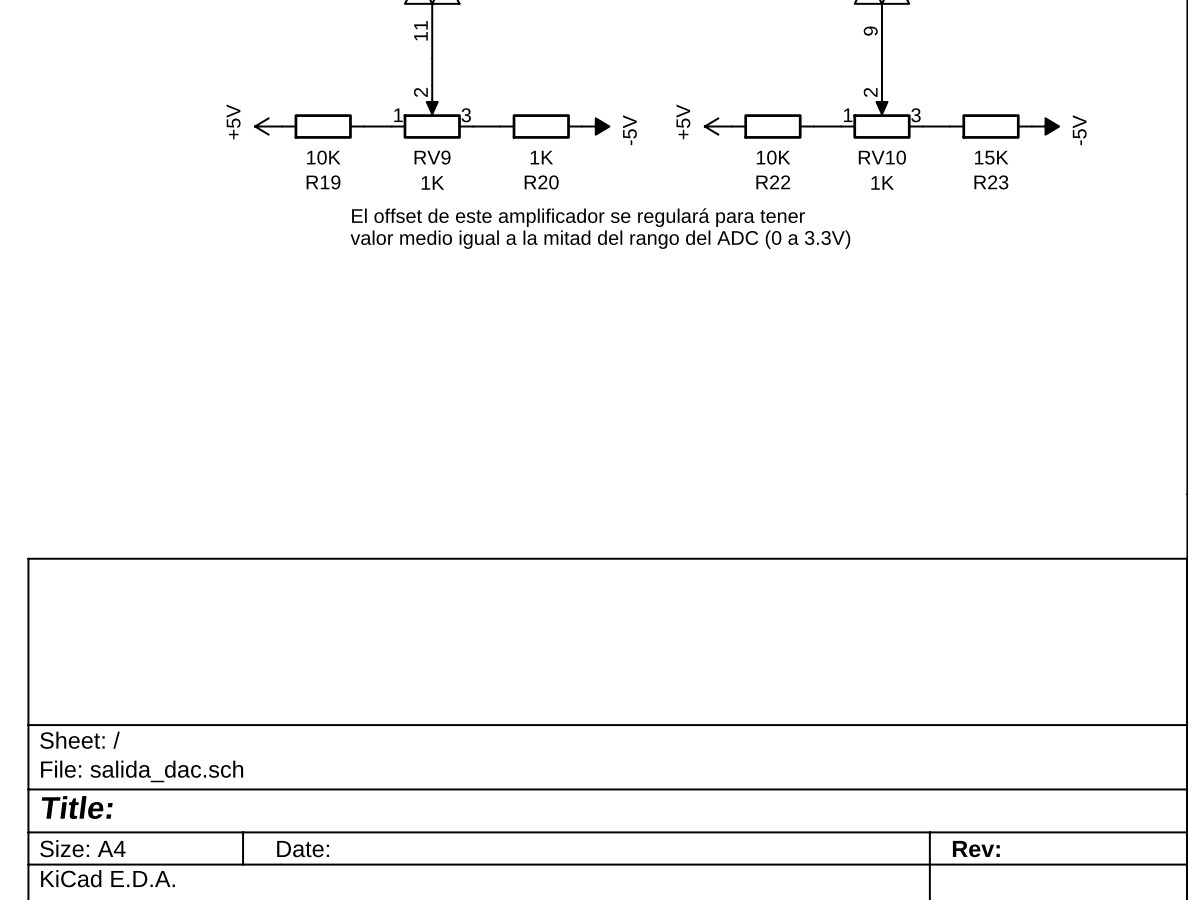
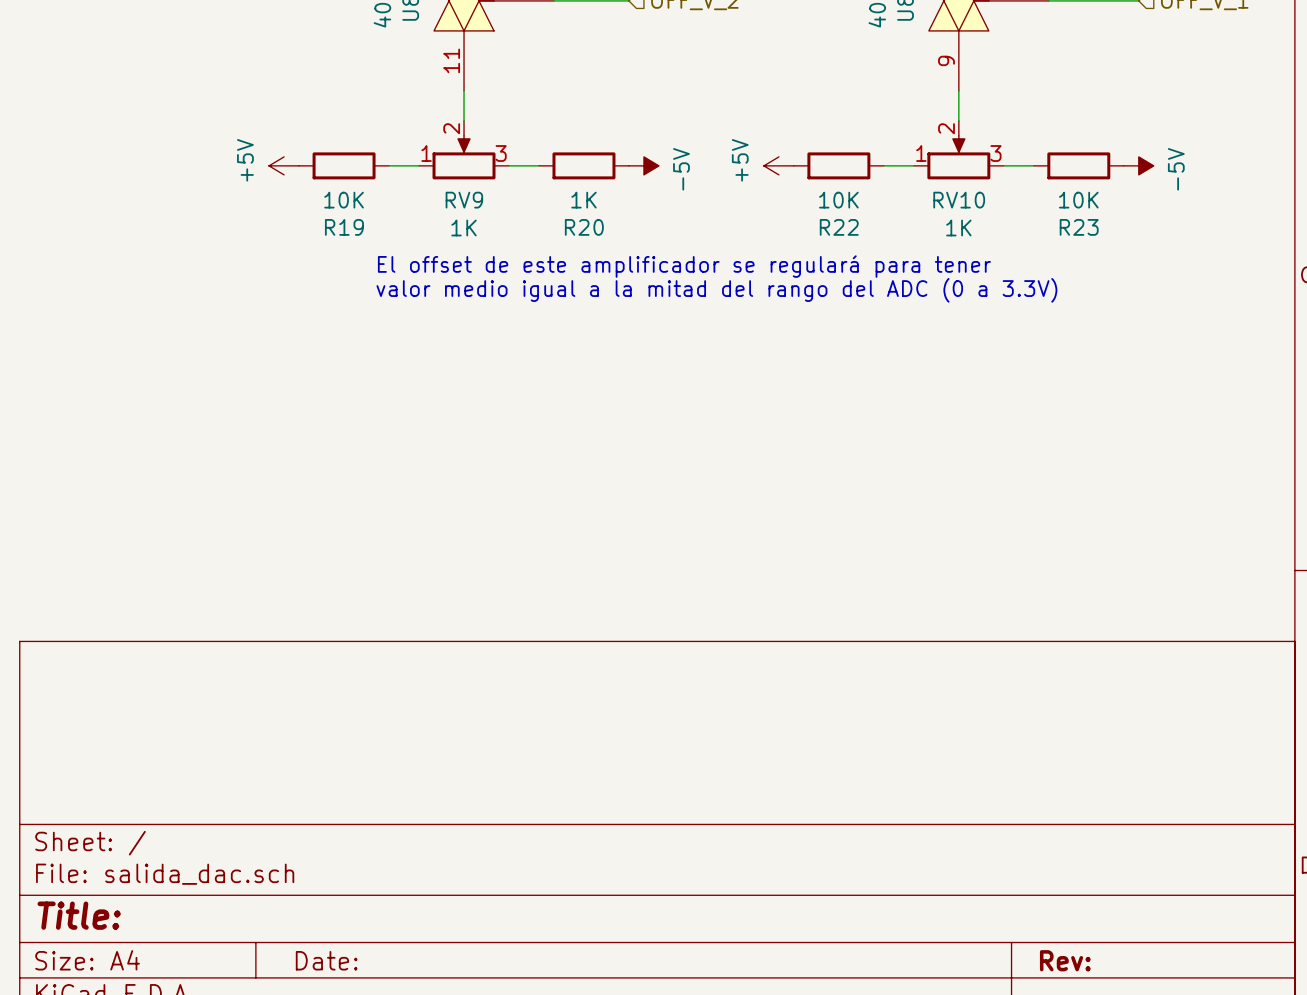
R23 value: 15K (991, 157) -> 10K (1078, 200)

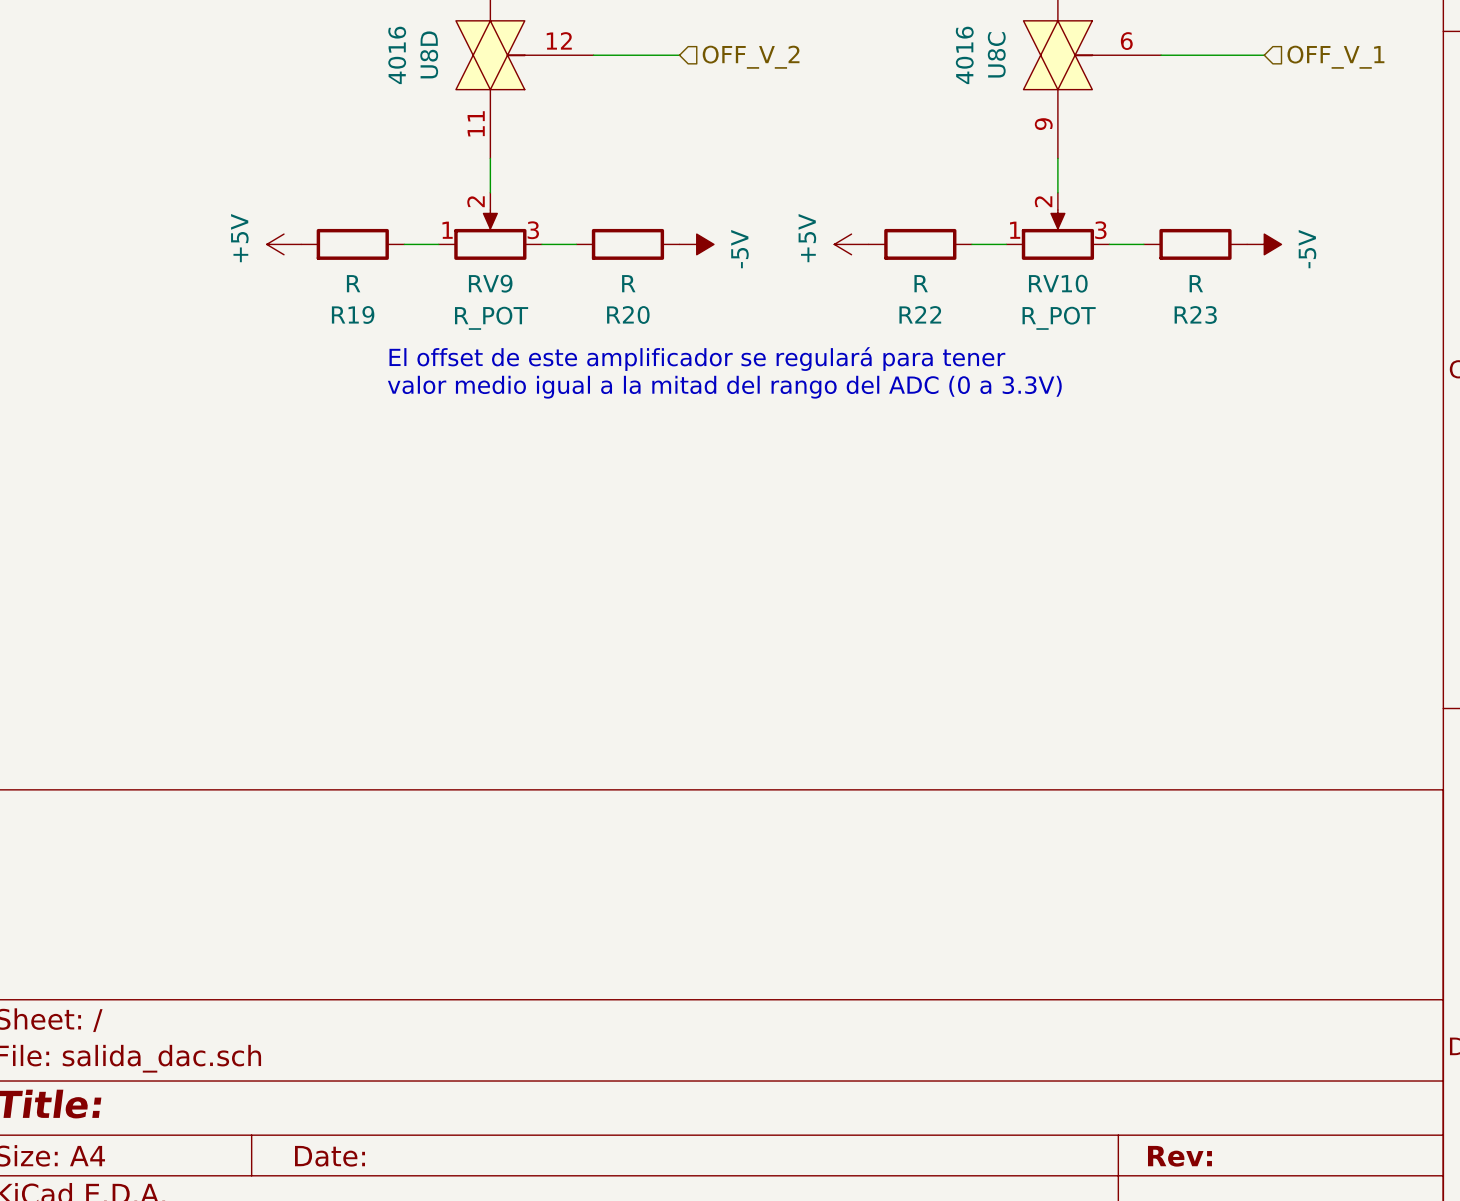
R19 value: 10K (344, 200) -> R (353, 283)
R20 value: 1K (583, 200) -> R (628, 283)
R22 value: 10K (838, 200) -> R (921, 283)
R23 value: 10K (1078, 200) -> R (1196, 283)
RV9 value: 1K (464, 228) -> R_POT (491, 318)
RV10 value: 1K (958, 228) -> R_POT (1059, 318)

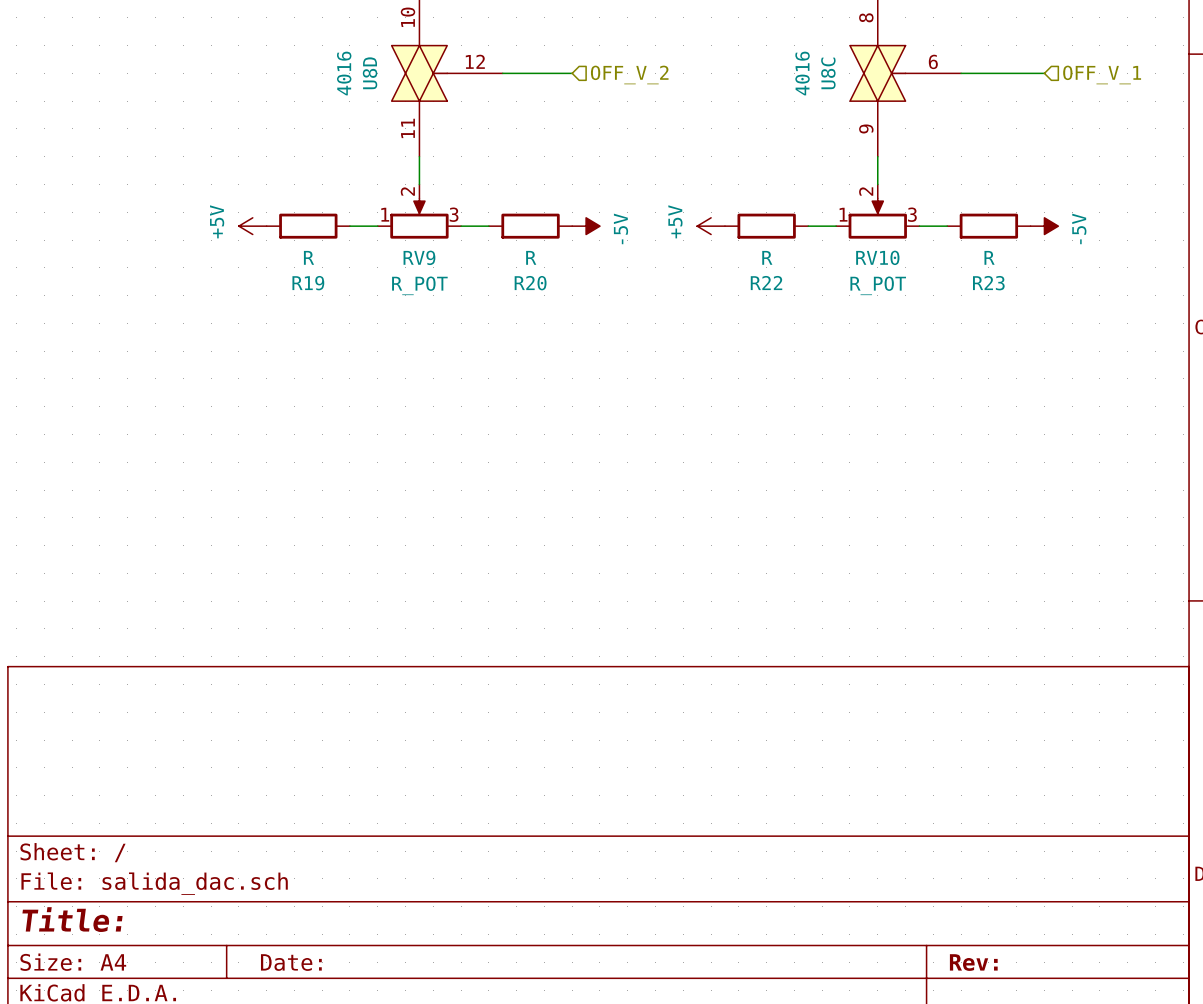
text: El offset de este amplificador se regulará para tener (697, 359) -> none
text: valor medio igual a la mitad del rango del ADC (0 a 3.3V) (724, 387) -> none

